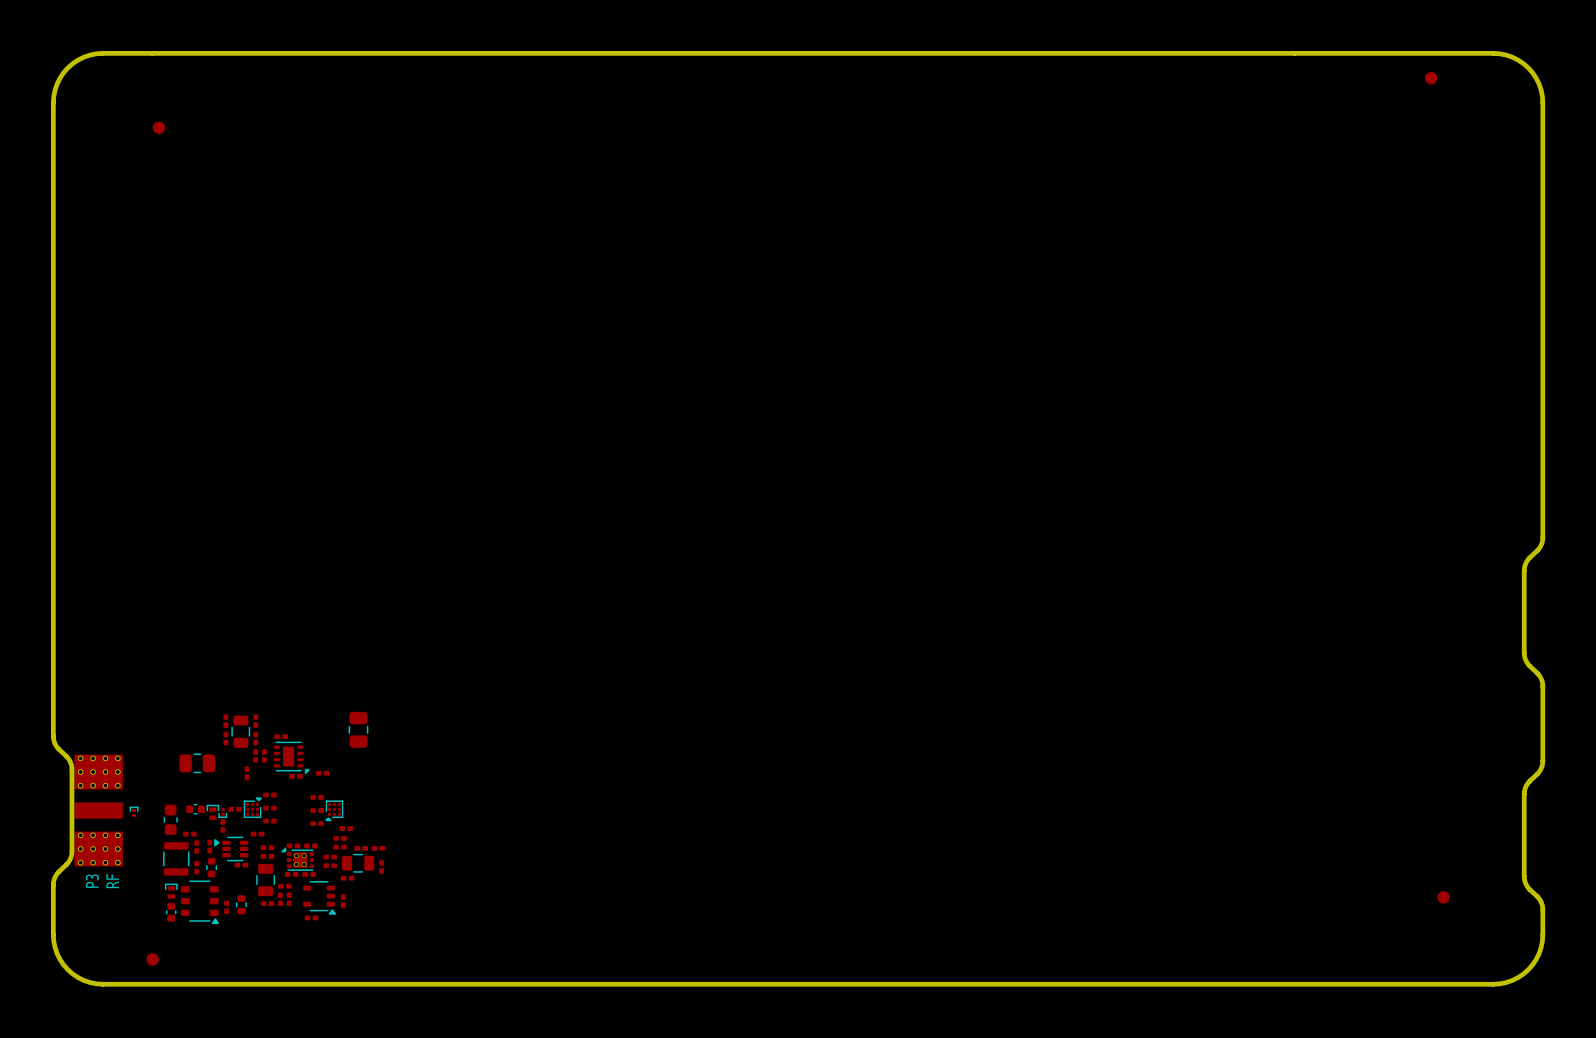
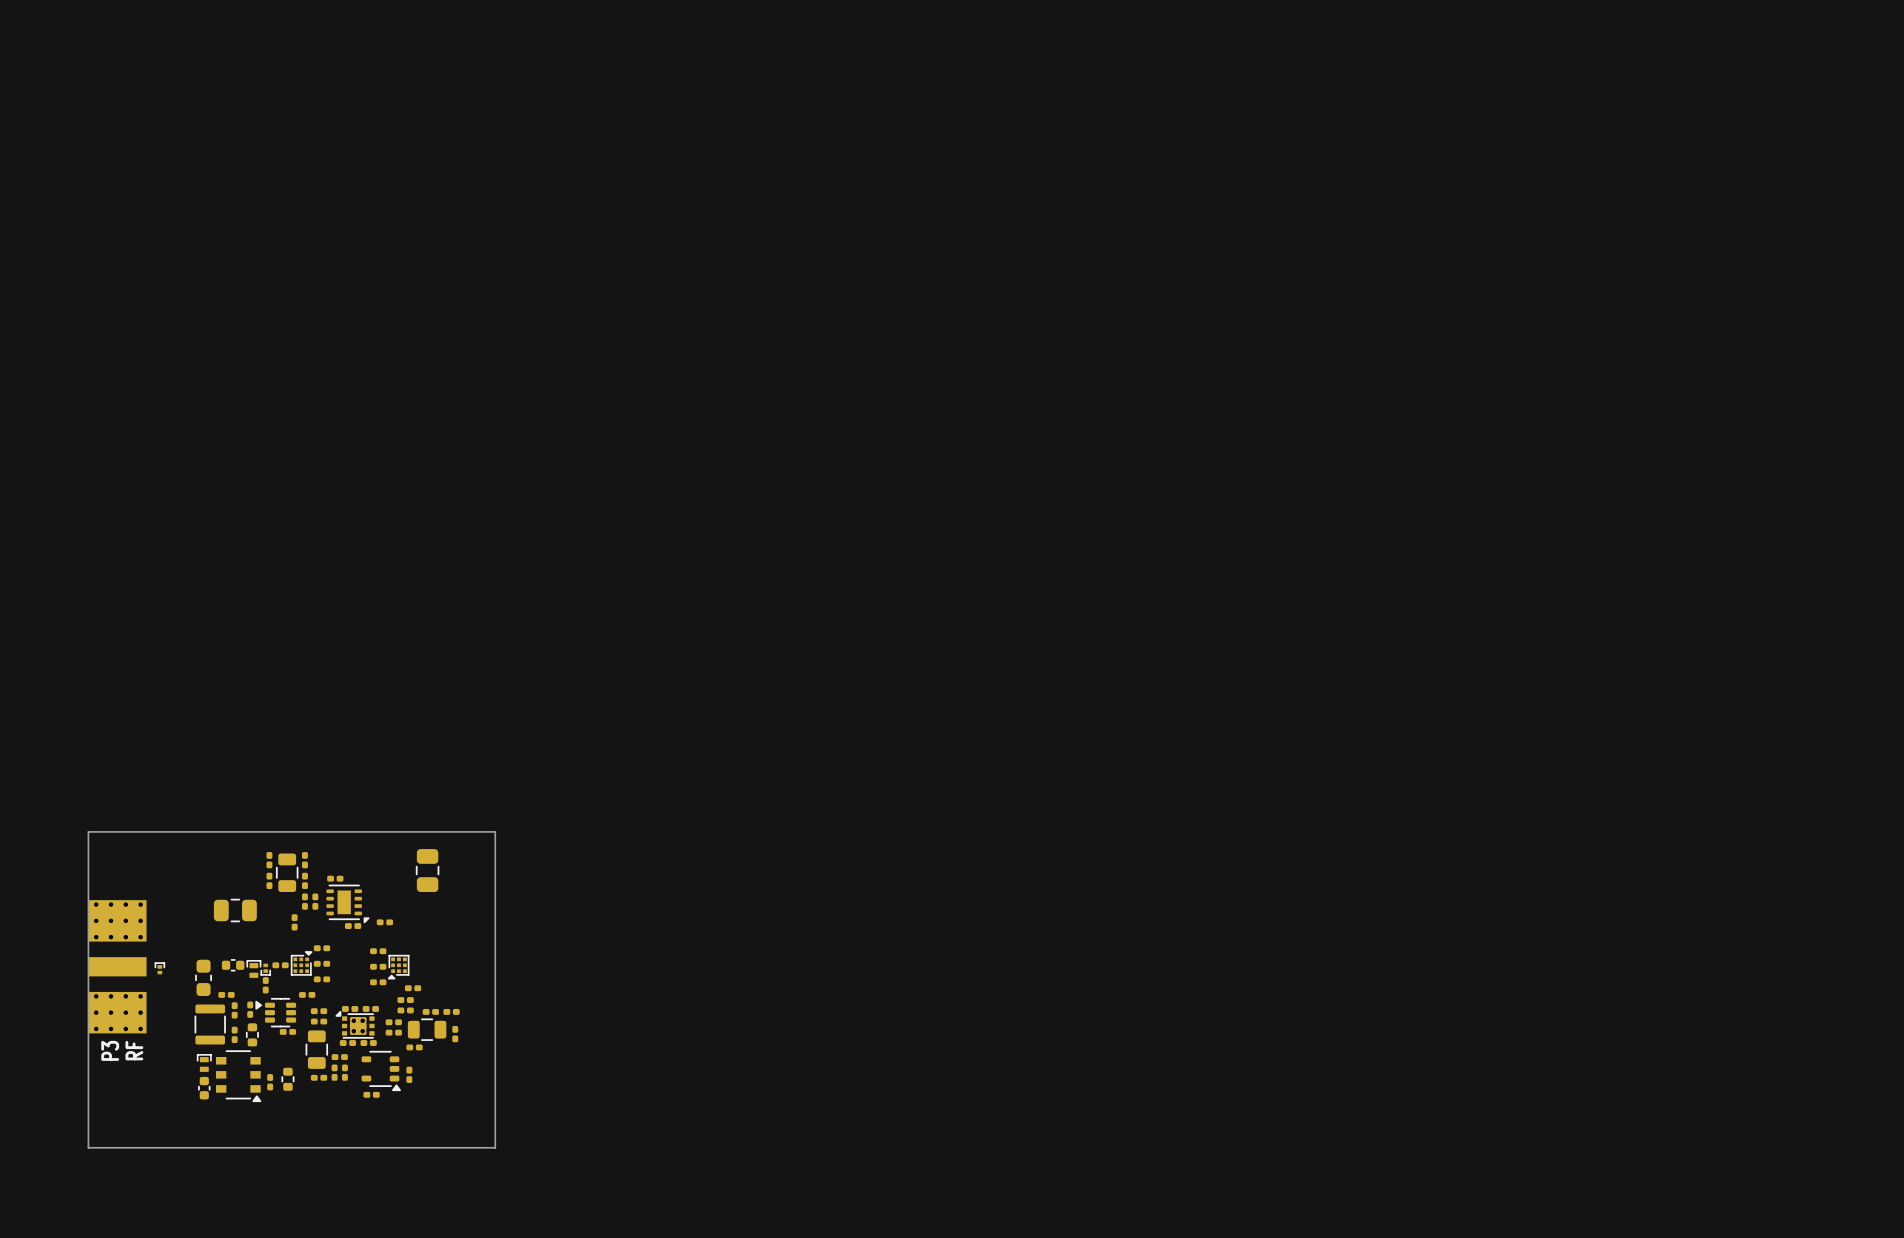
board edge: (103, 53) (1493, 53) (1506, 55) (1518, 60) (1528, 67) (1536, 78) (1541, 90) (1542, 103) (1542, 537) (1540, 546) (1526, 561) (1524, 570) (1524, 655) (1528, 664) (1540, 677) (1542, 686) (1542, 763) (1539, 772) (1526, 785) (1524, 794) (1524, 878) (1528, 887) (1540, 900) (1542, 907) (1542, 941) (1536, 959) (1528, 969) (1518, 977) (1506, 982) (1493, 984) (103, 984) (90, 982) (78, 977) (67, 969) (60, 959) (55, 947) (53, 934) (53, 880) (57, 873) (69, 860) (71, 851) (71, 767) (68, 758) (55, 745) (53, 736) (53, 103) (57, 84) (67, 67) (84, 57) (103, 53) -> none
part: (1431, 78) -> none
part: (158, 127) -> none
board edge: none -> (88, 831) (495, 831) (495, 1147) (88, 1147) (88, 832)
part: (1443, 897) -> none
part: (152, 959) -> none

